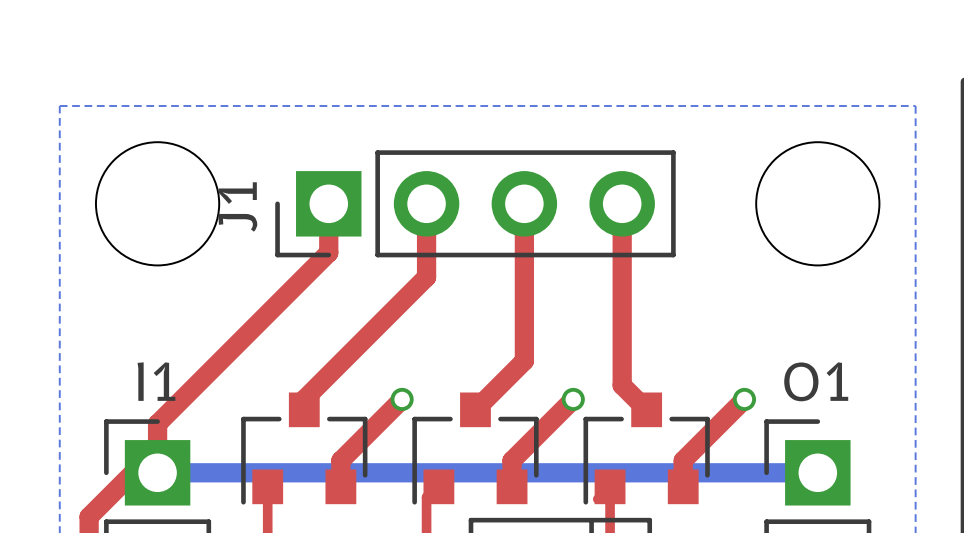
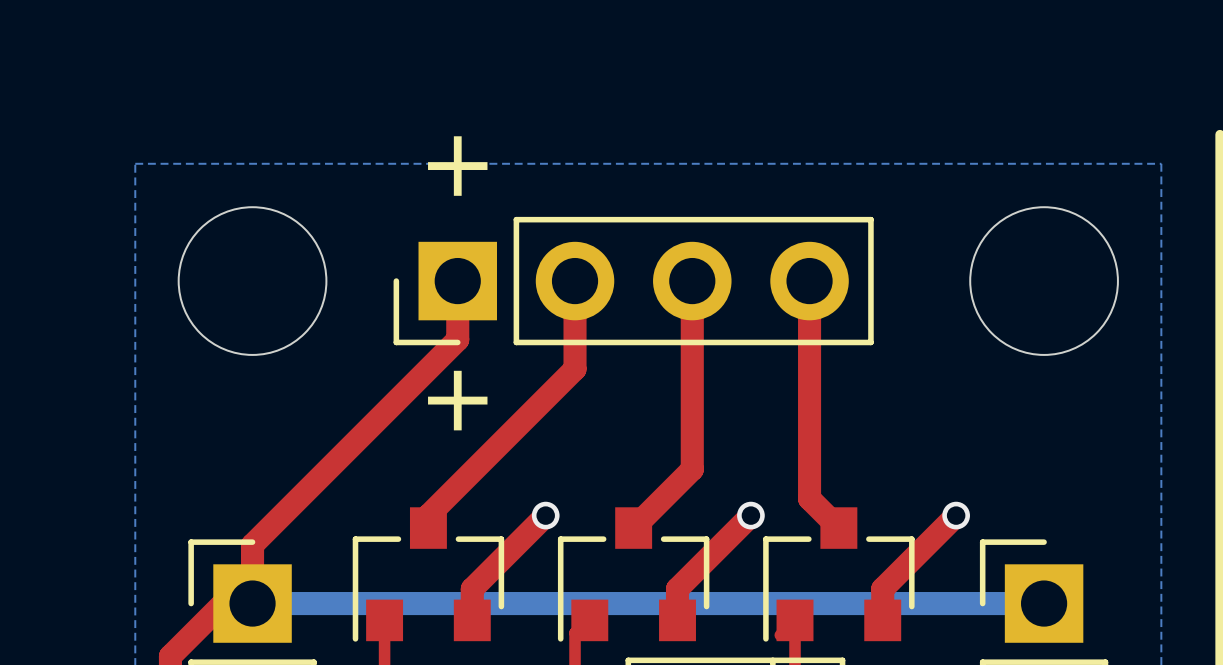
text: none -> + (457, 166)
J1 name: J1 (237, 206) -> none
text: none -> + (457, 400)
I1 name: I1 (156, 381) -> none
O1 name: O1 (816, 381) -> none

